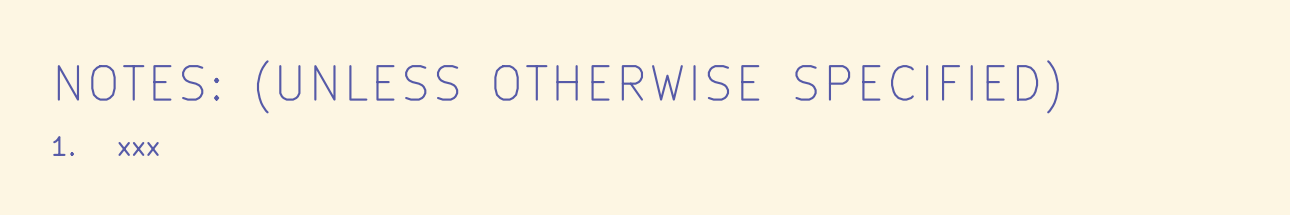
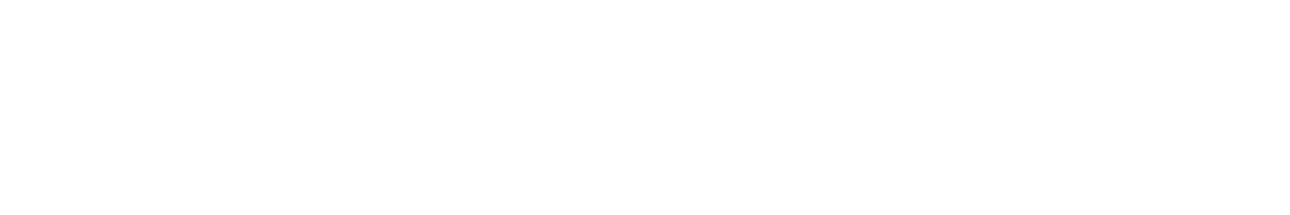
text: NOTES: (UNLESS OTHERWISE SPECIFIED) (558, 86) -> none
text: 1. xxx (105, 145) -> none

